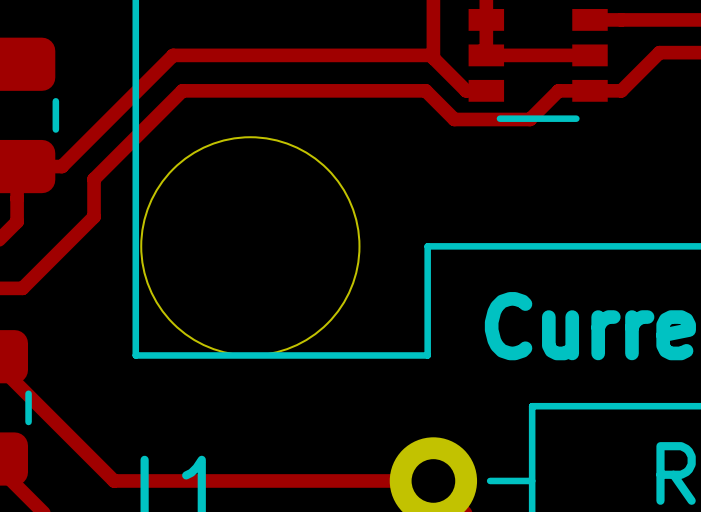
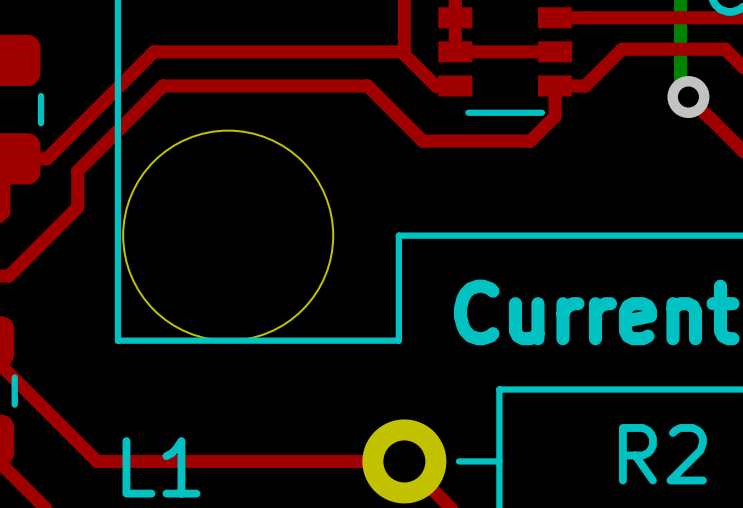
top track: (395, 90) (425, 90) (454, 119) (529, 119) (558, 90) (589, 90) -> (367, 85) (422, 141) (530, 141) (555, 116) (554, 87)

